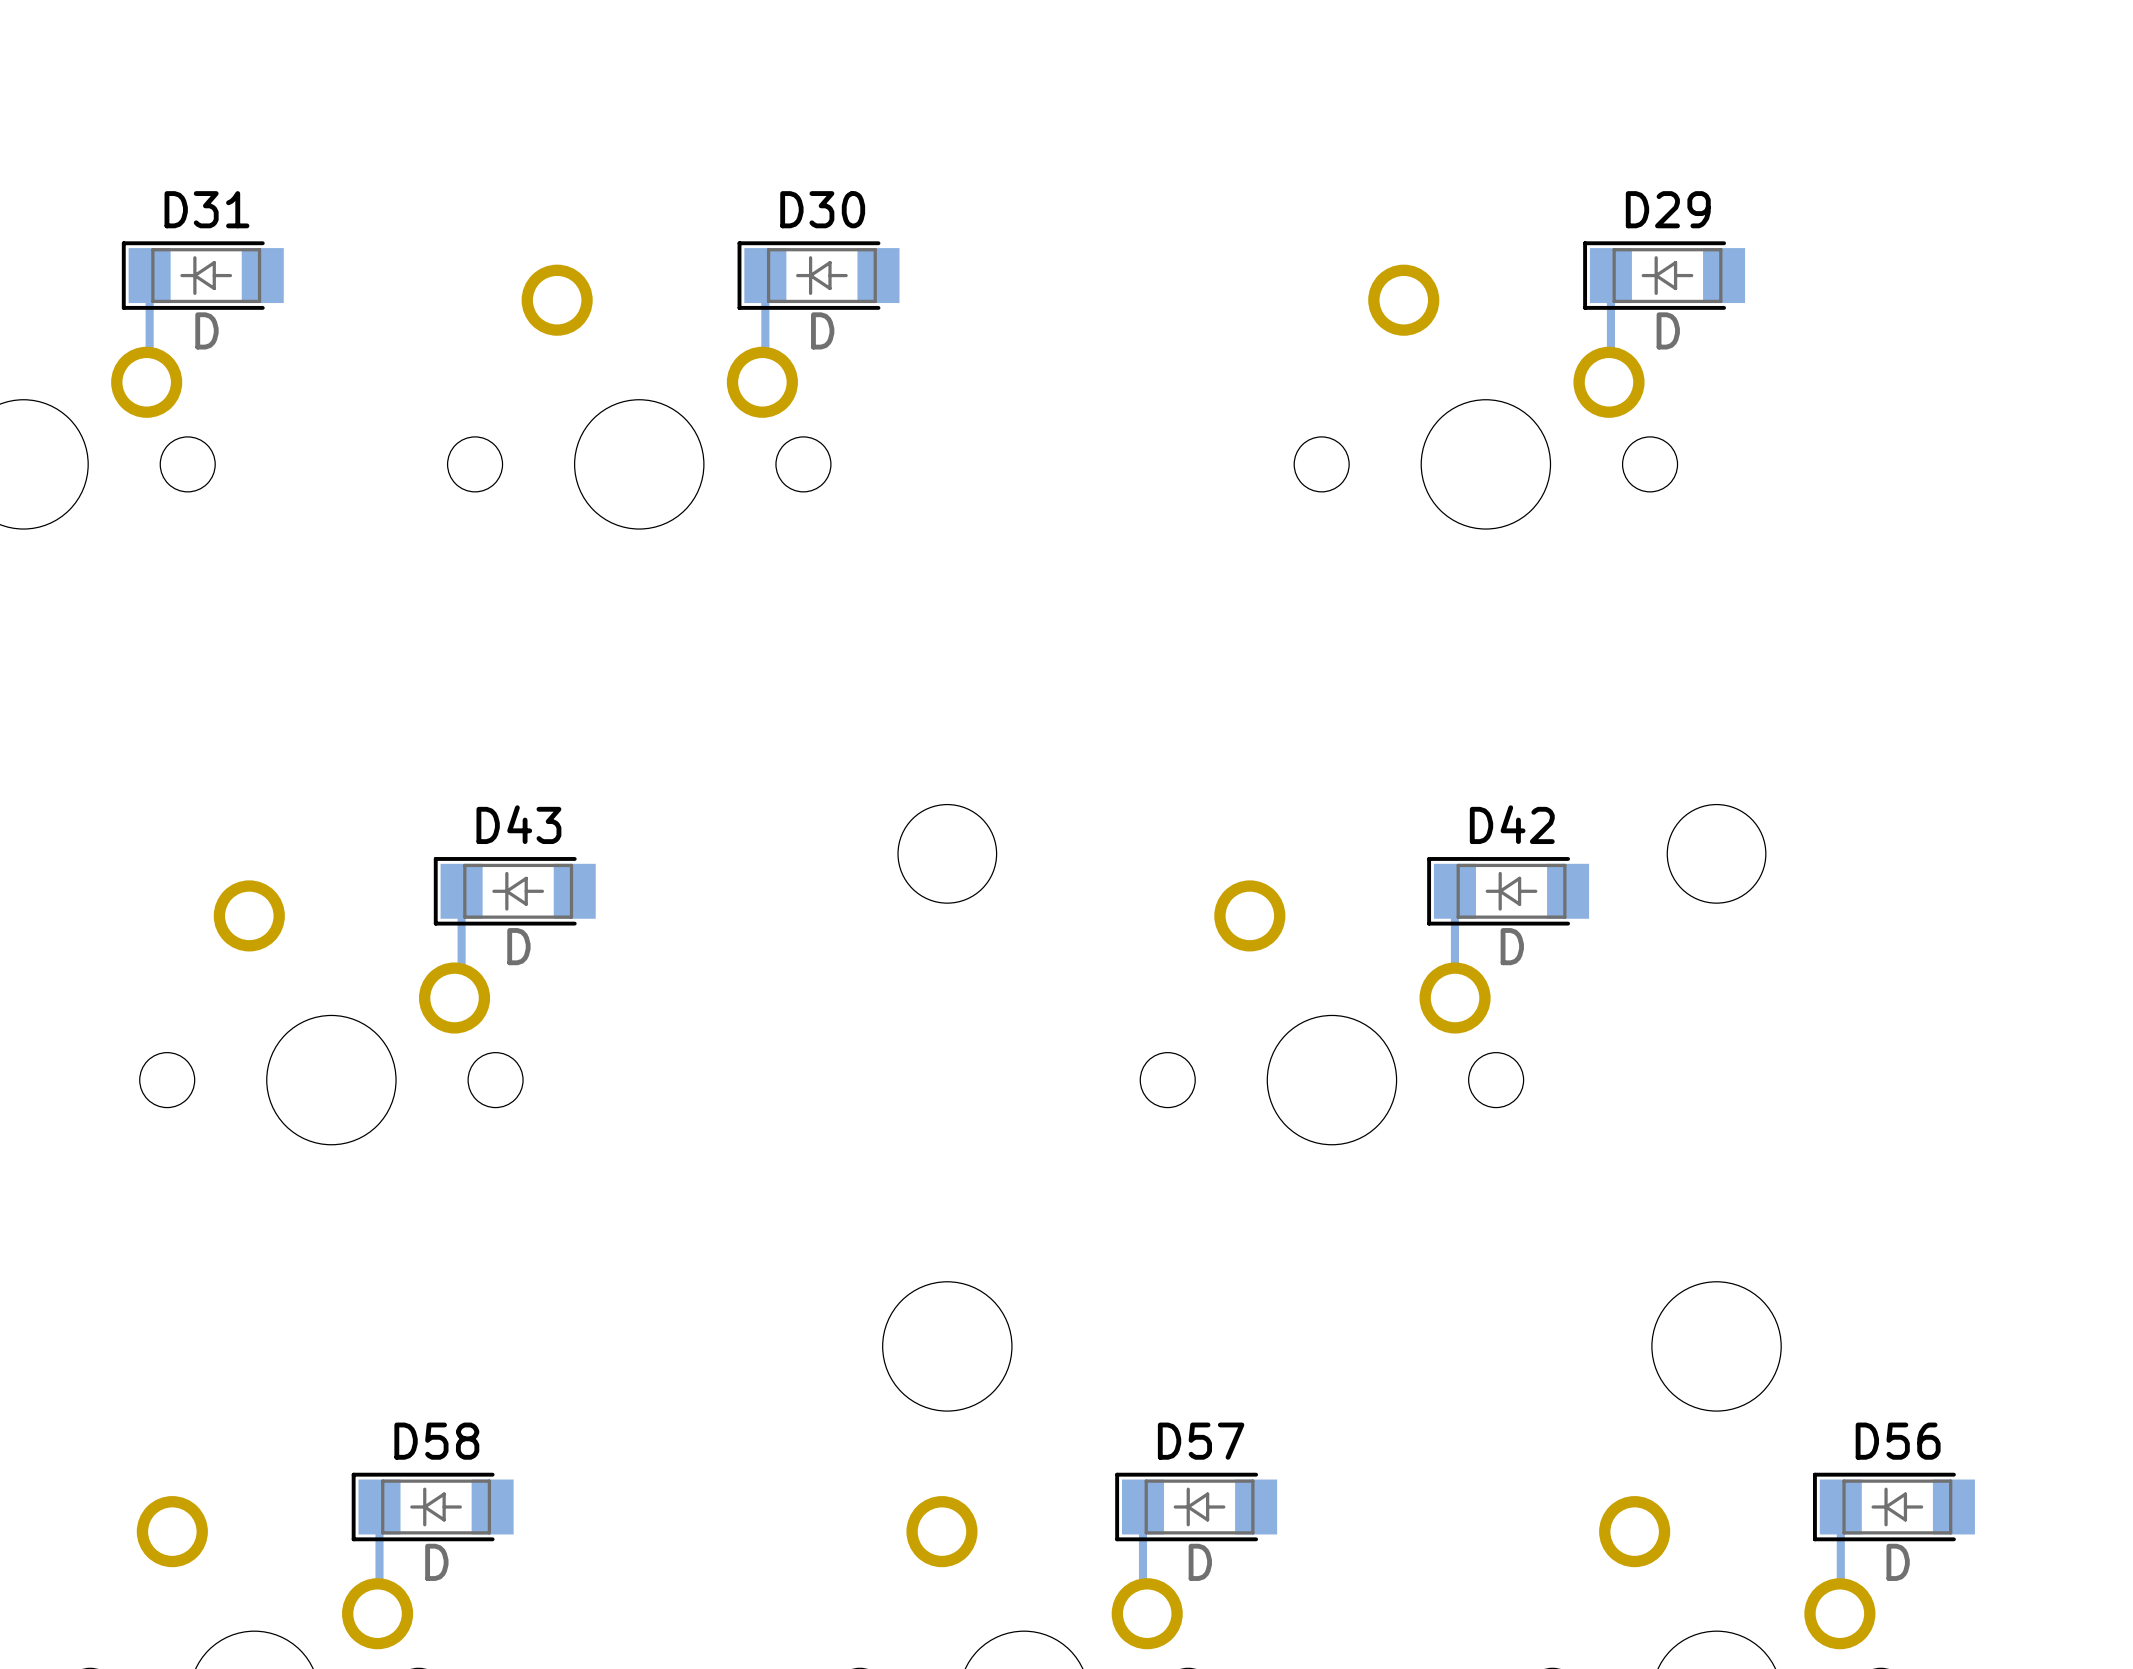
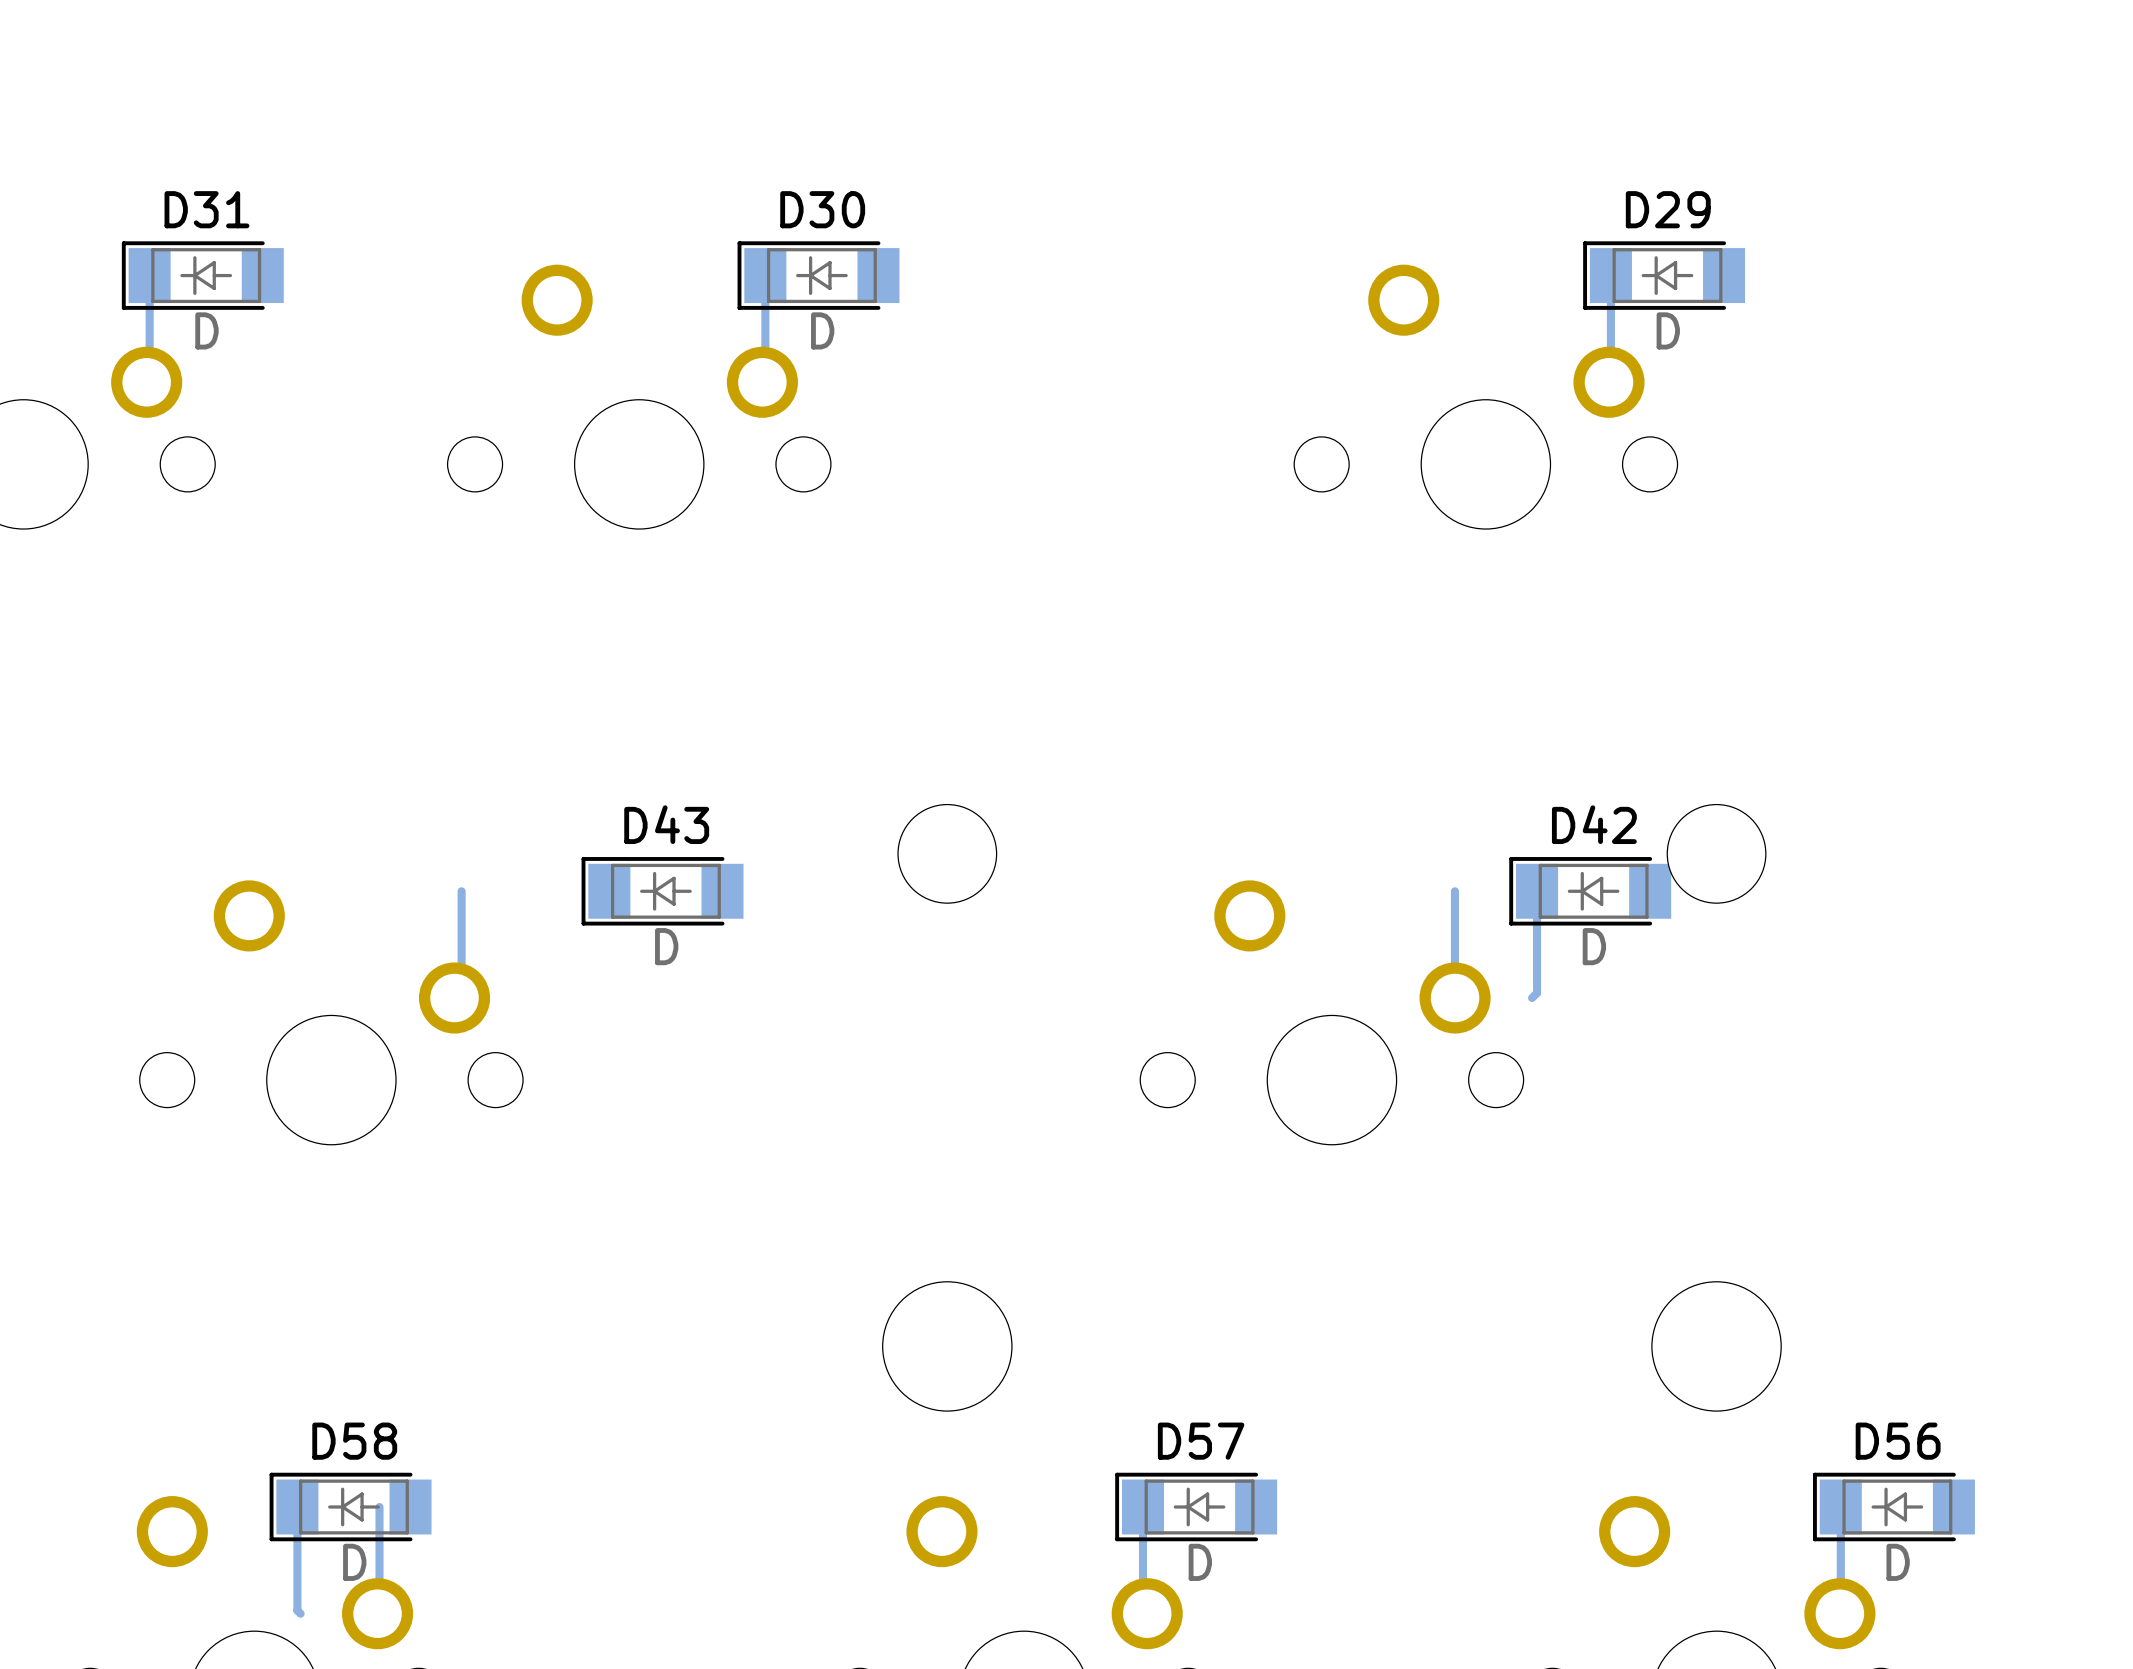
D43 position: (514, 891) -> (662, 891)
D42 position: (1508, 891) -> (1590, 891)
track: none -> (1537, 891) (1537, 992) (1532, 998)
track: none -> (297, 1507) (297, 1610) (300, 1613)
D58 position: (432, 1507) -> (350, 1507)

